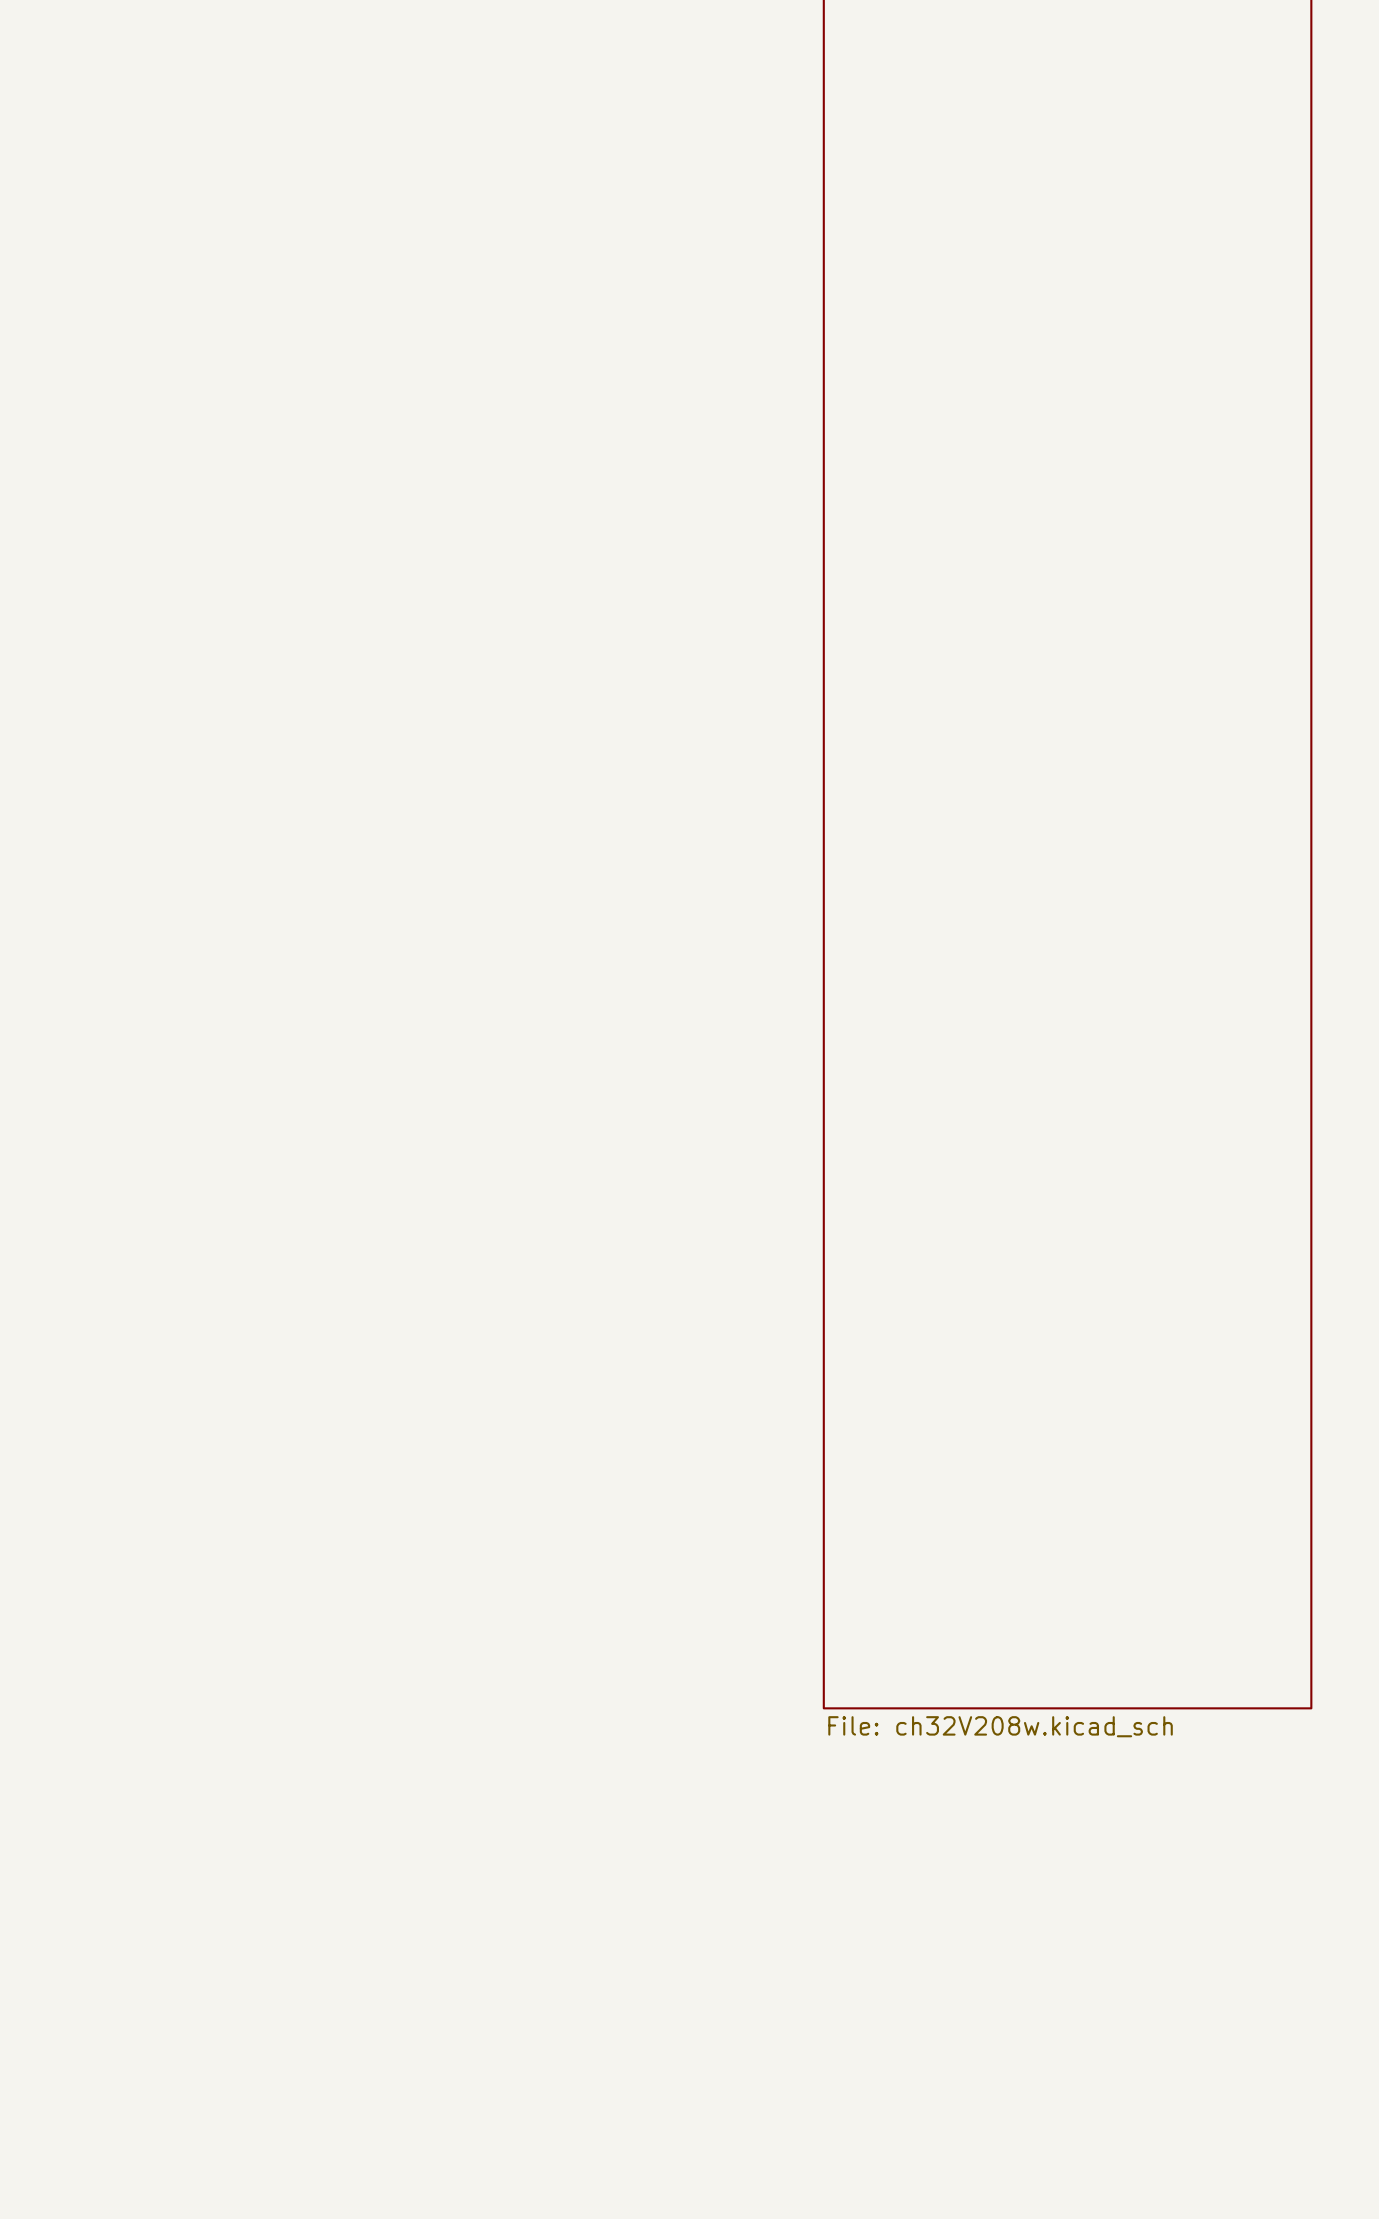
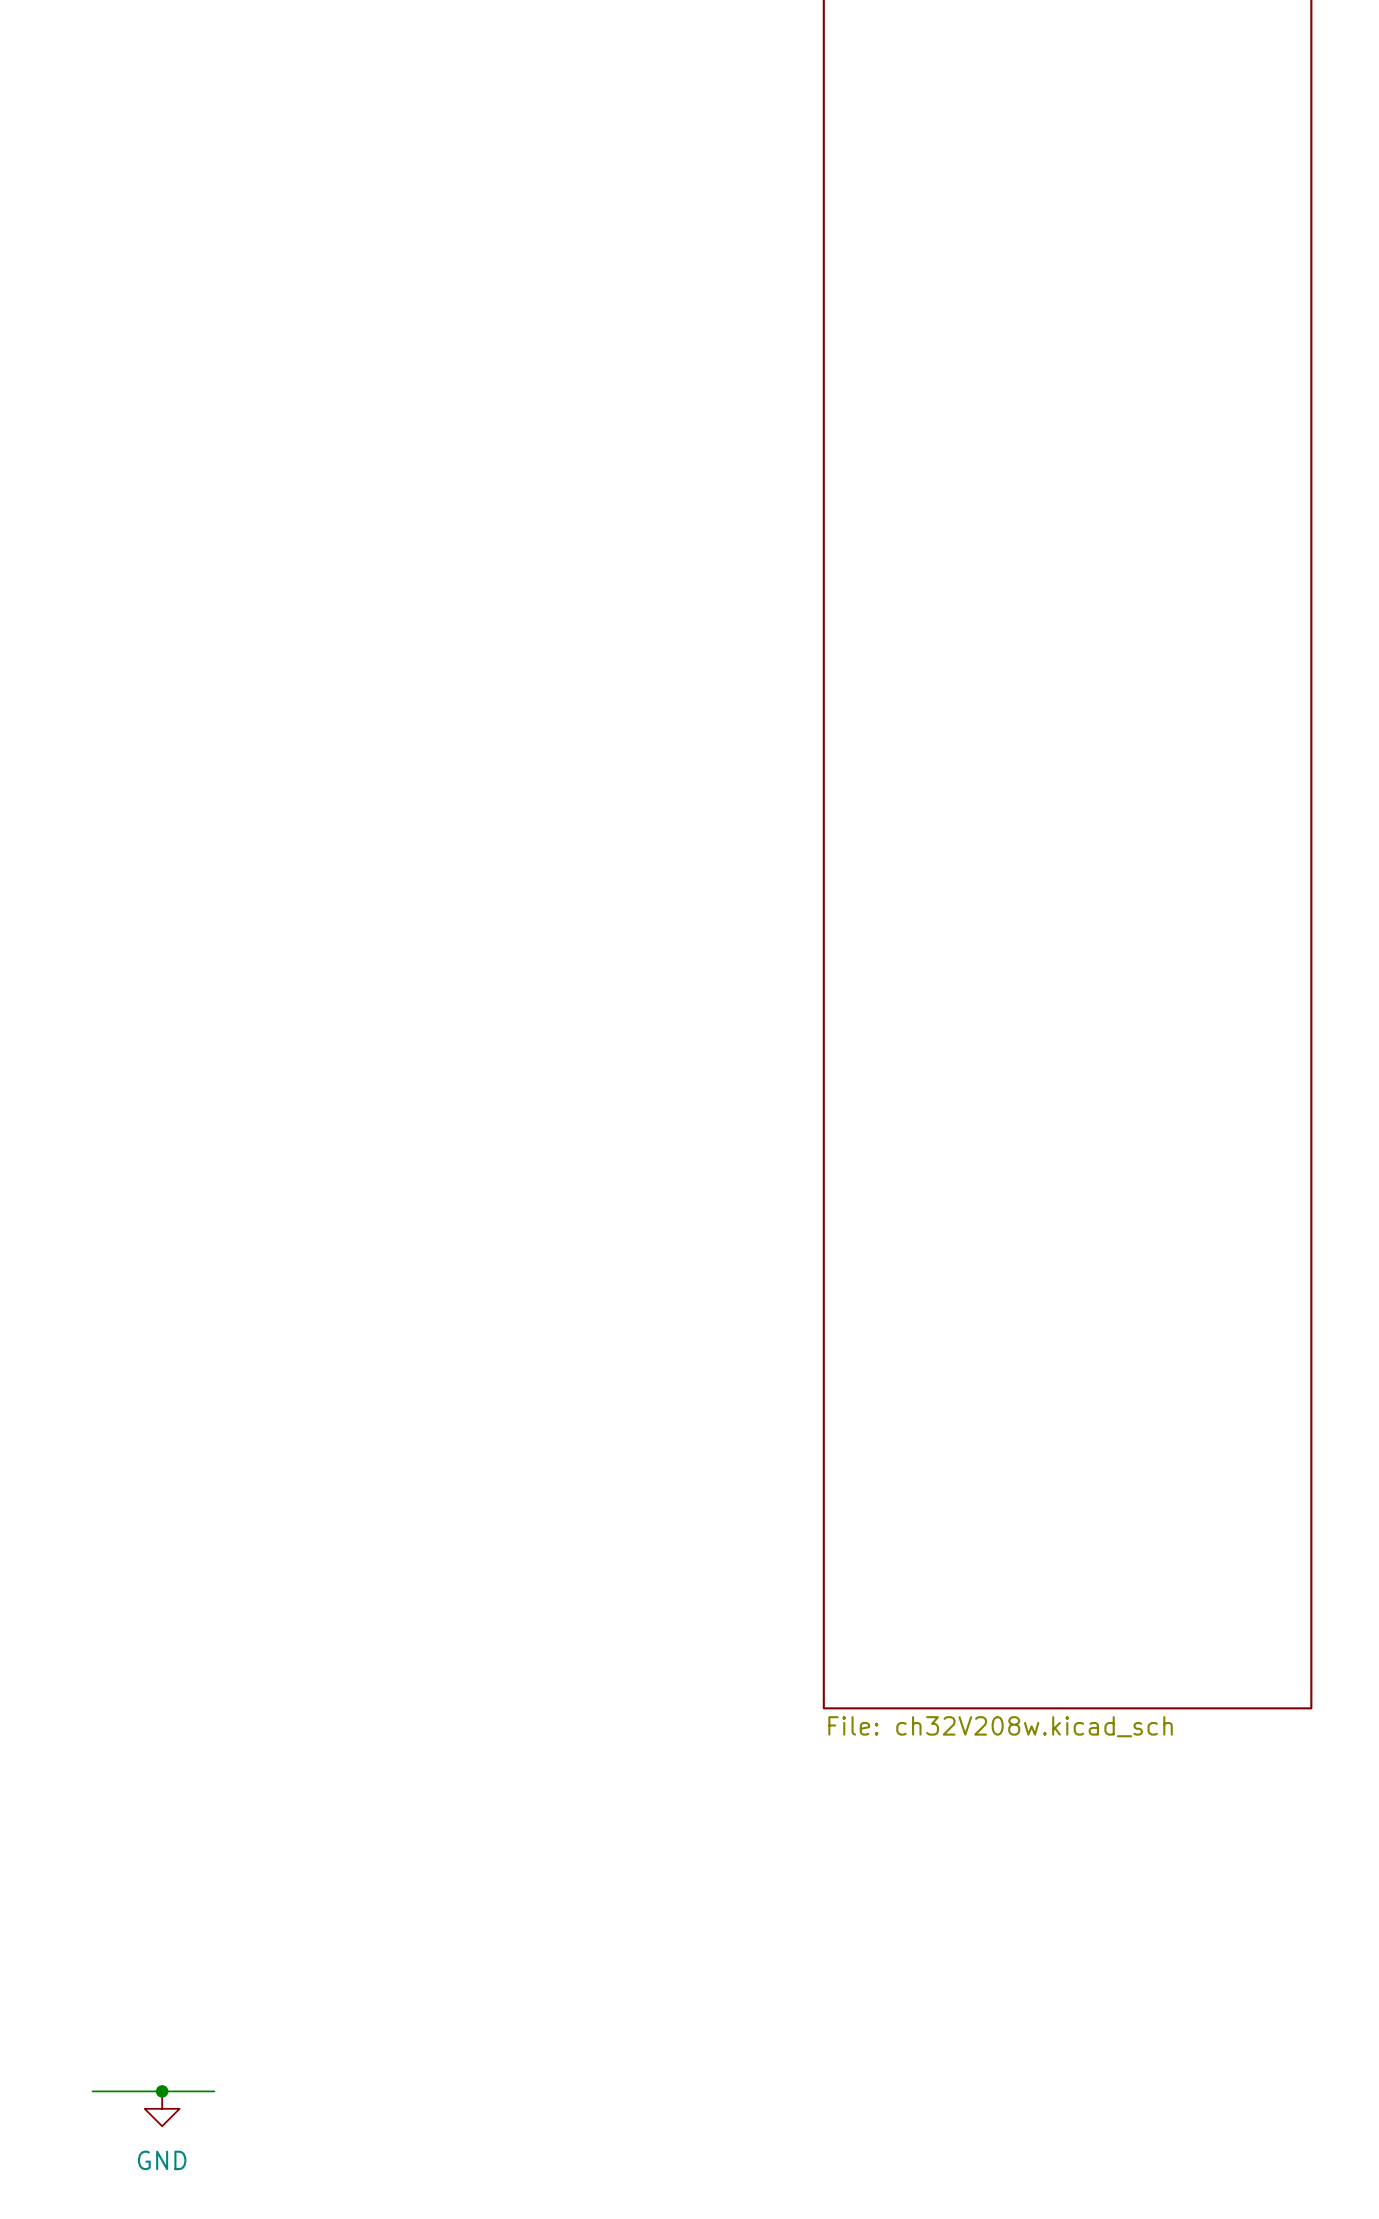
wire: none -> (92, 2091) (214, 2091)
junction: none -> (162, 2091)
power symbol: none -> GND (162, 2108)

